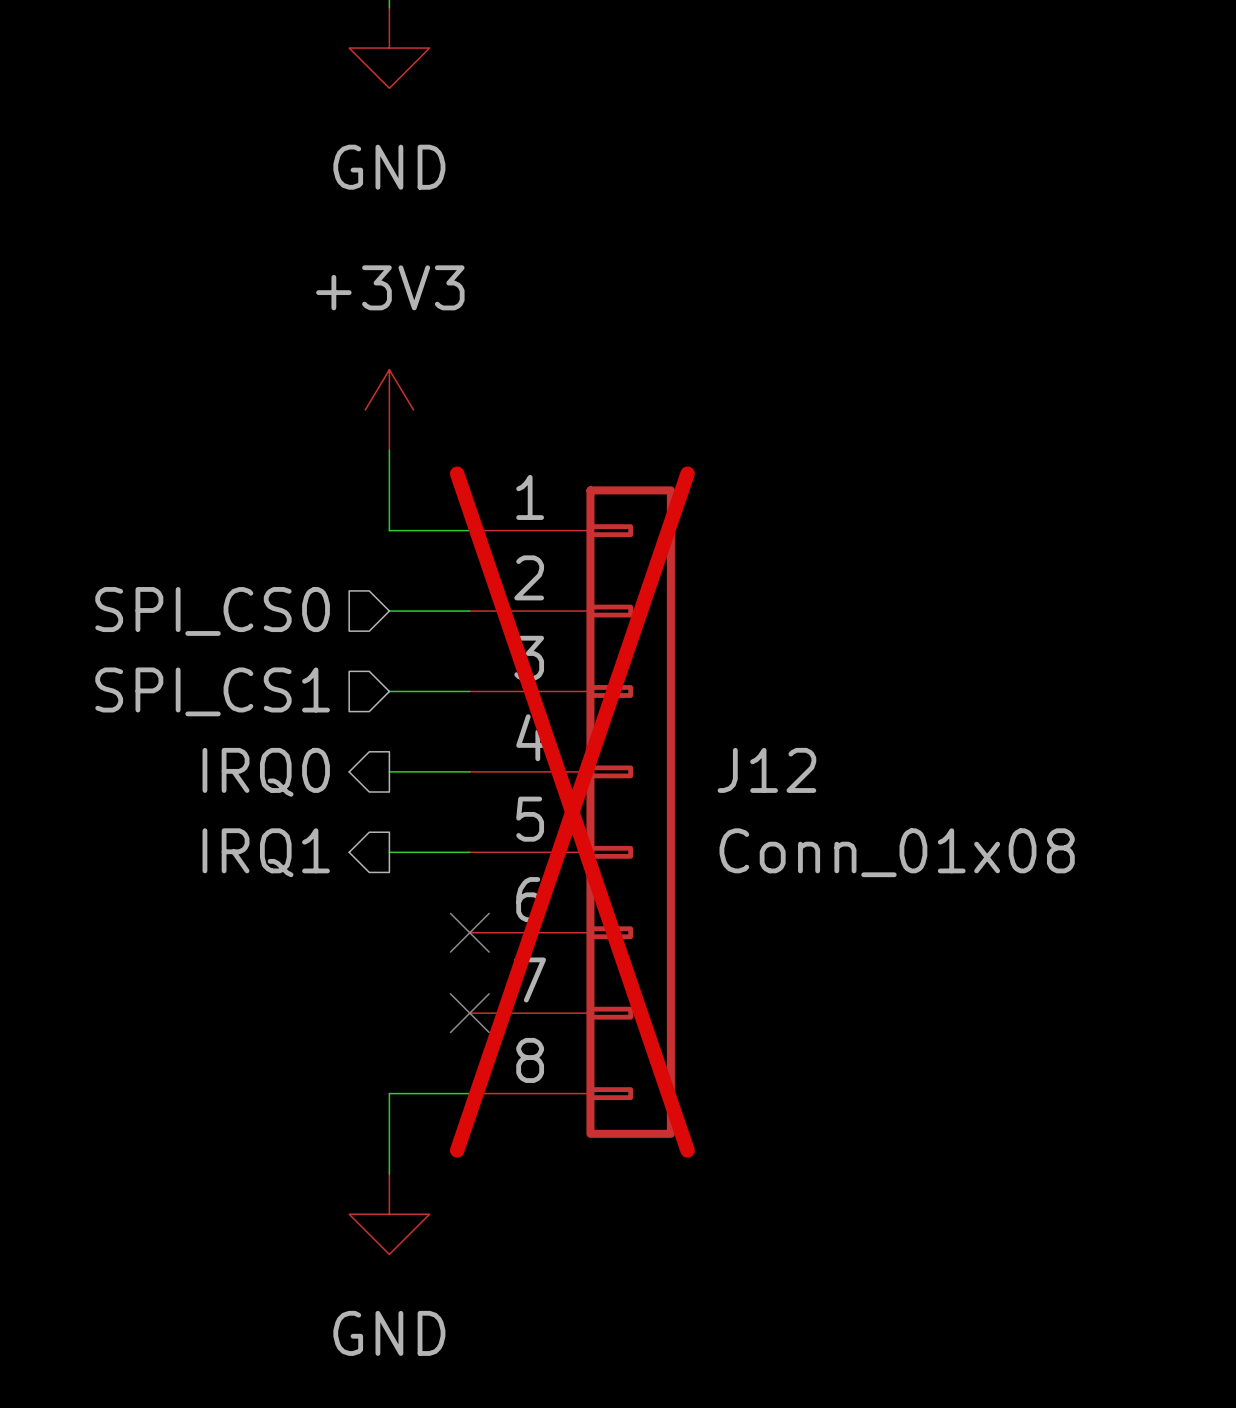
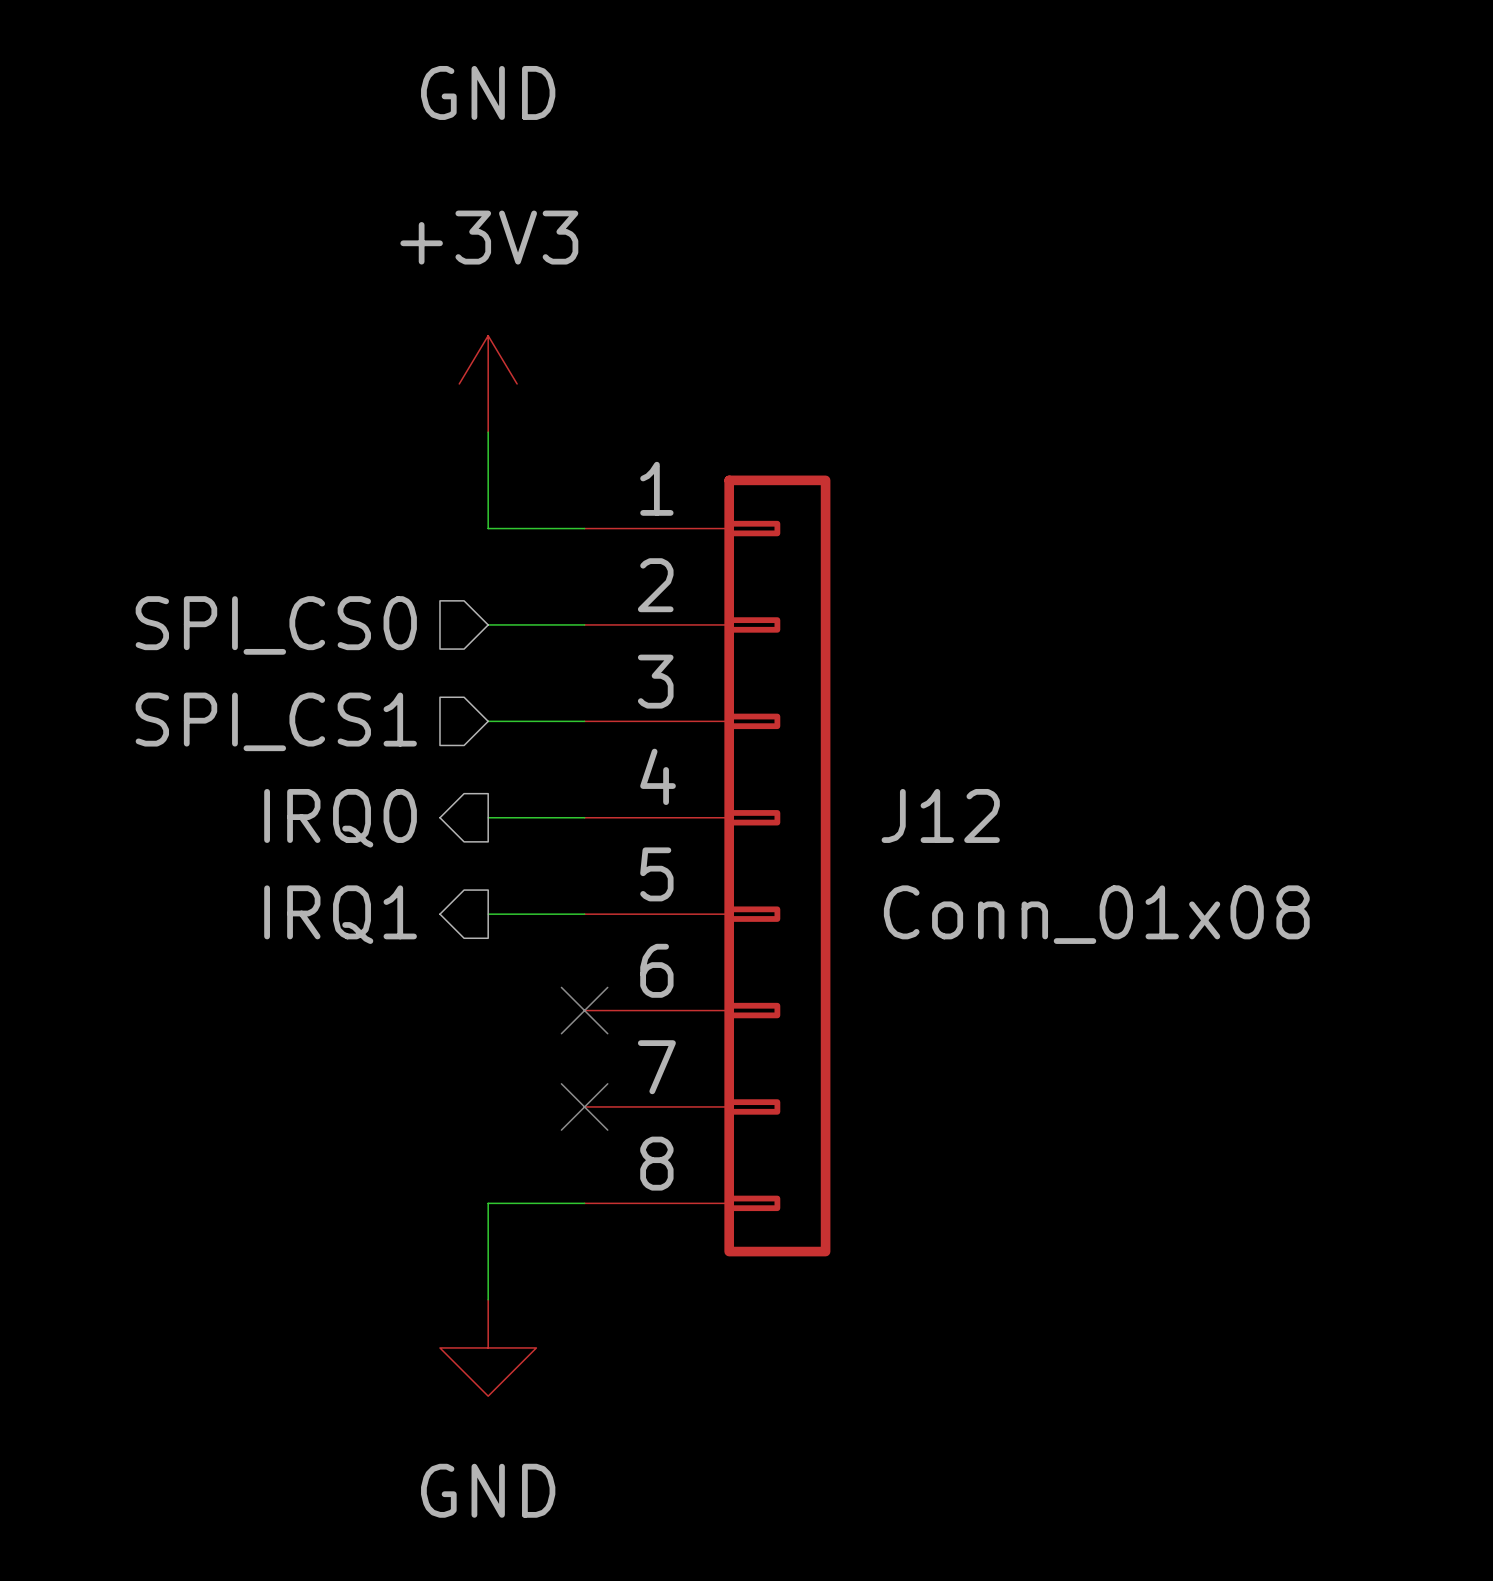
J12 do-not-place cross: (572, 812) -> none

